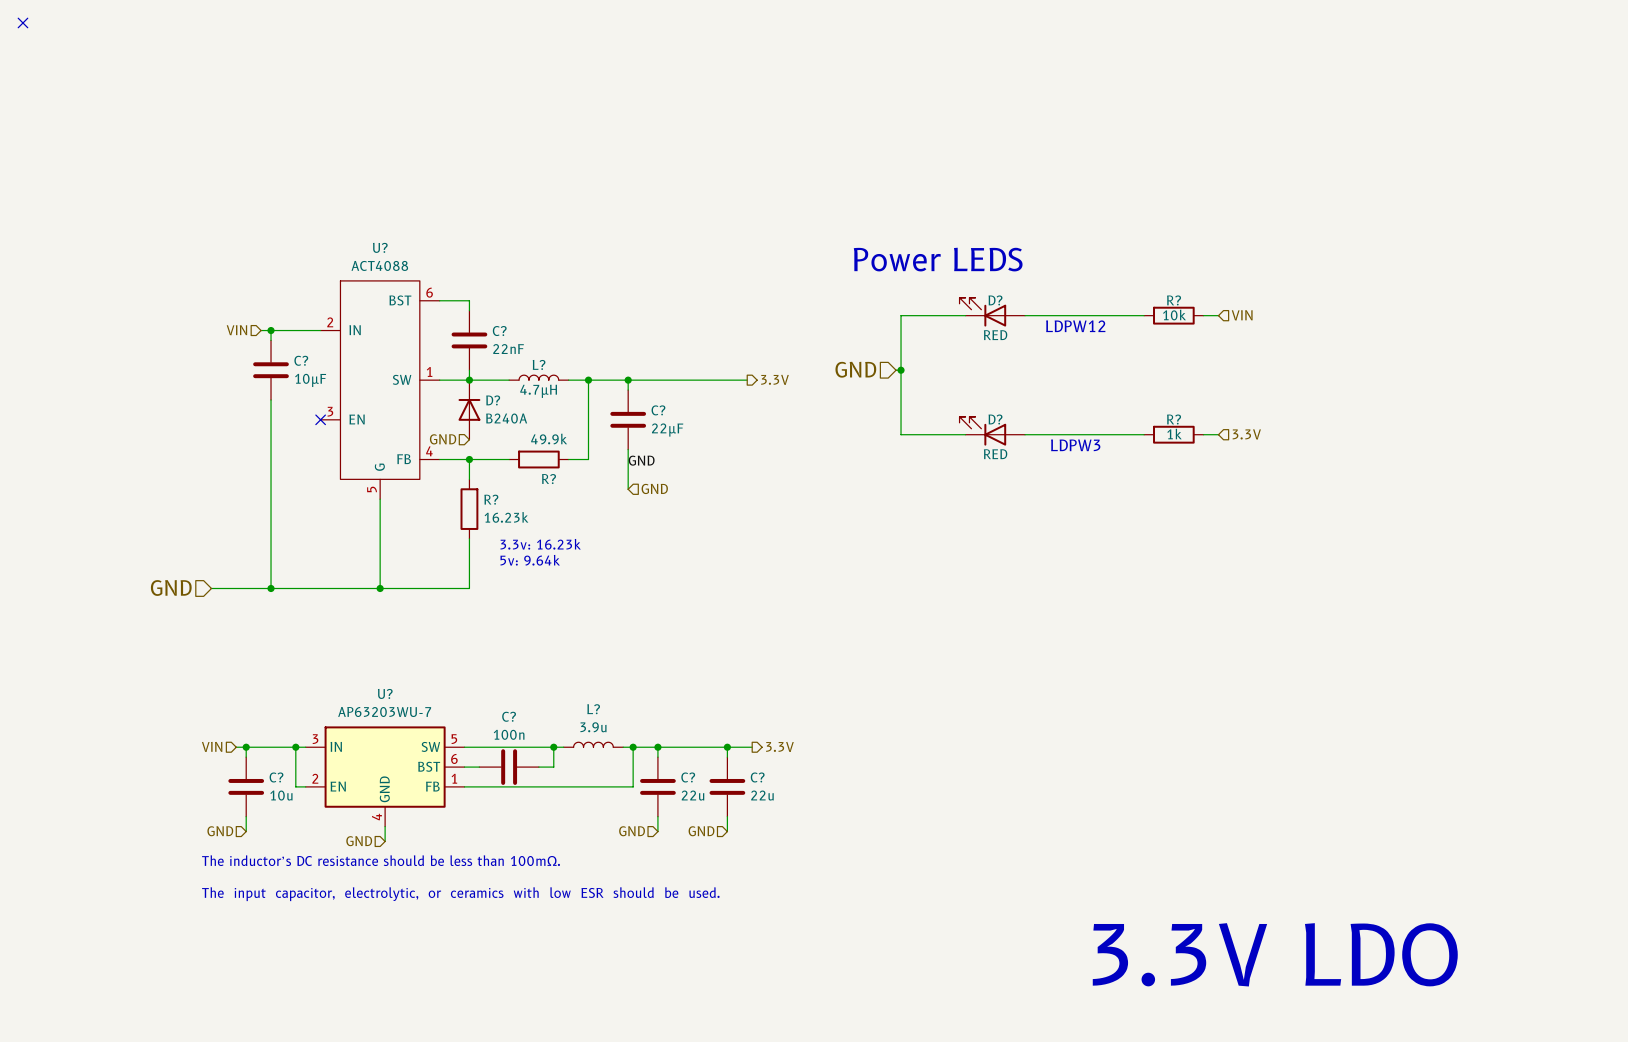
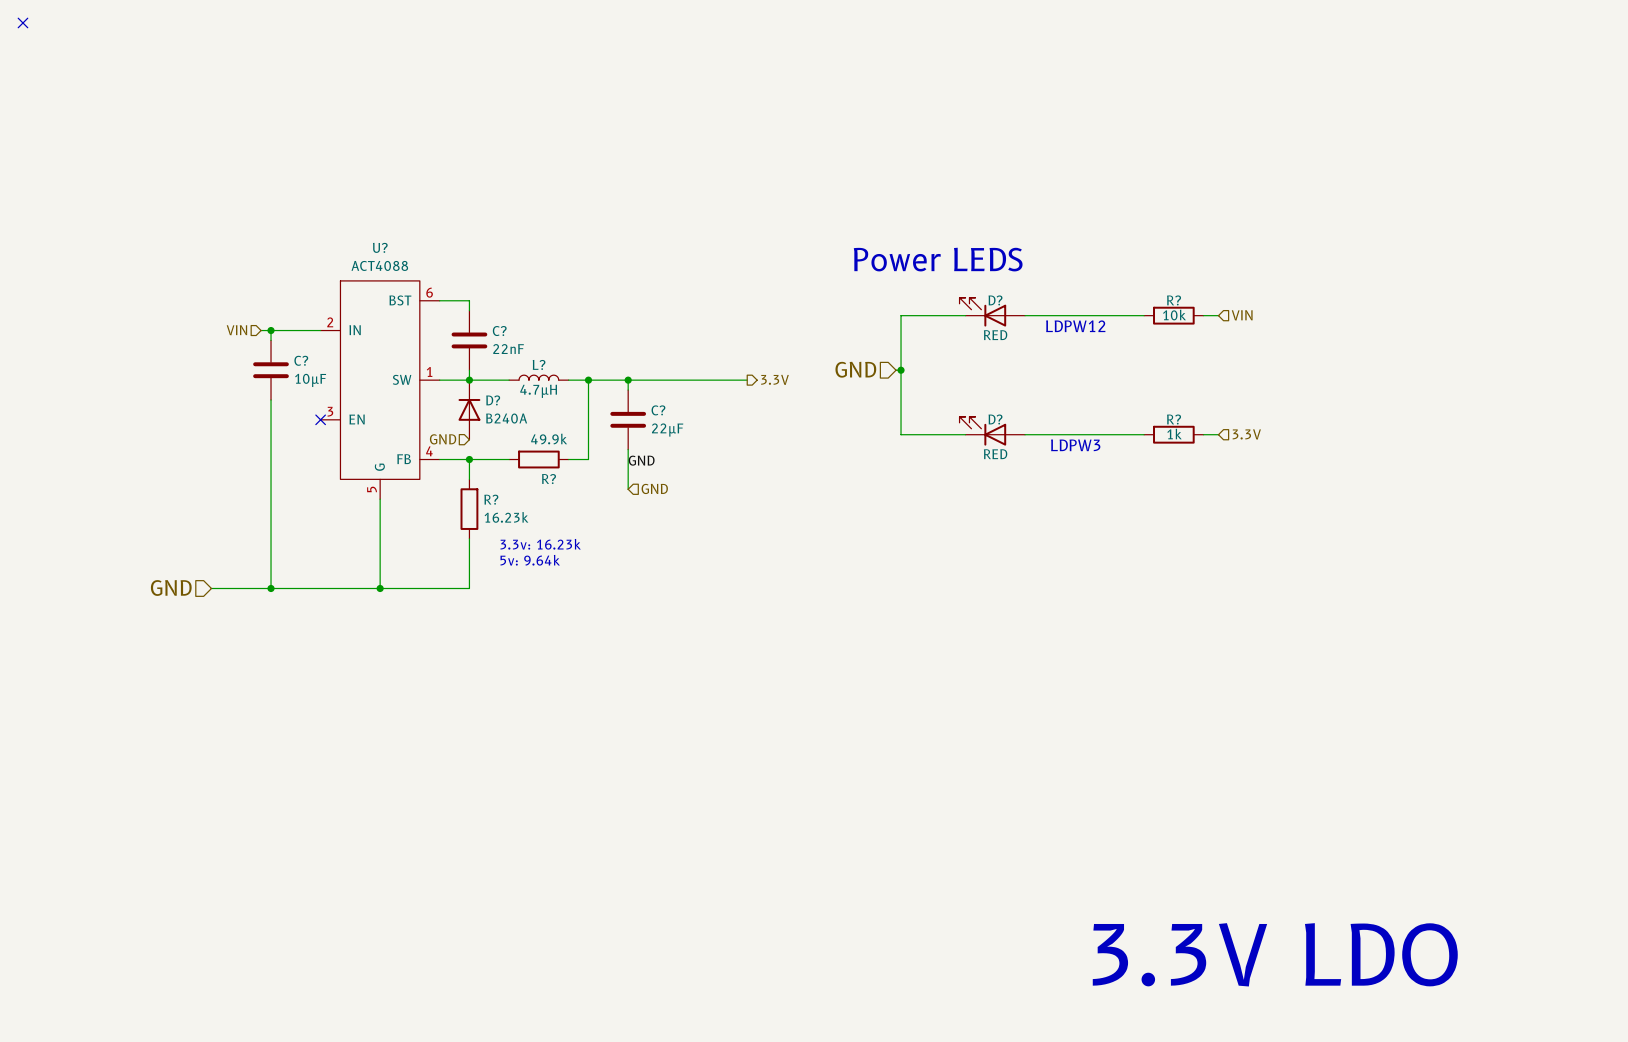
L?: 3.9u (593, 744) -> none
hierarchical label: VIN (212, 746) -> none
hierarchical label: 3.3V (779, 746) -> none
wire: (236, 747) (305, 747) -> none
wire: (246, 747) (246, 757) -> none
junction: (246, 747) -> none
wire: (295, 747) (295, 786) (305, 786) -> none
junction: (295, 747) -> none
wire: (464, 747) (563, 747) -> none
wire: (553, 747) (553, 767) (538, 767) -> none
junction: (553, 747) -> none
wire: (623, 747) (752, 747) -> none
wire: (633, 747) (633, 786) (464, 786) -> none
junction: (633, 747) -> none
wire: (657, 747) (657, 757) -> none
junction: (657, 747) -> none
wire: (727, 747) (727, 757) -> none
junction: (727, 747) -> none
wire: (464, 767) (479, 767) -> none
C?: 100n (509, 767) -> none
U?: AP63203WU-7 (385, 776) -> none
C?: 10u (246, 786) -> none
C?: 22u (657, 786) -> none
C?: 22u (727, 786) -> none
wire: (246, 816) (246, 831) -> none
wire: (657, 816) (657, 831) -> none
wire: (727, 816) (727, 831) -> none
wire: (385, 826) (385, 841) -> none
hierarchical label: GND (220, 831) -> none
hierarchical label: GND (632, 831) -> none
hierarchical label: GND (701, 831) -> none
hierarchical label: GND (359, 841) -> none
text: The inductor’s DC resistance should be less than 100mΩ. (381, 860) -> none
text: The input capacitor, electrolytic, or ceramics with low ESR should be used. (460, 894) -> none

